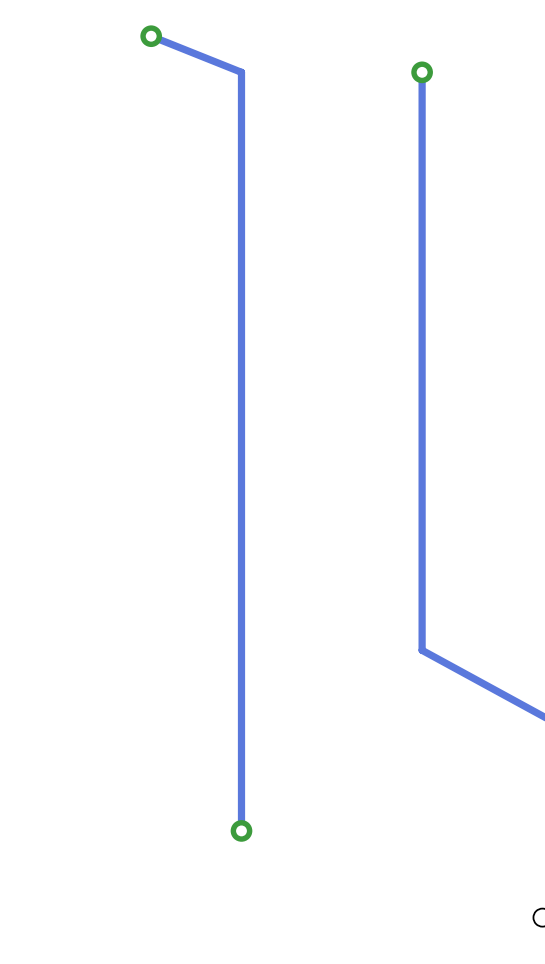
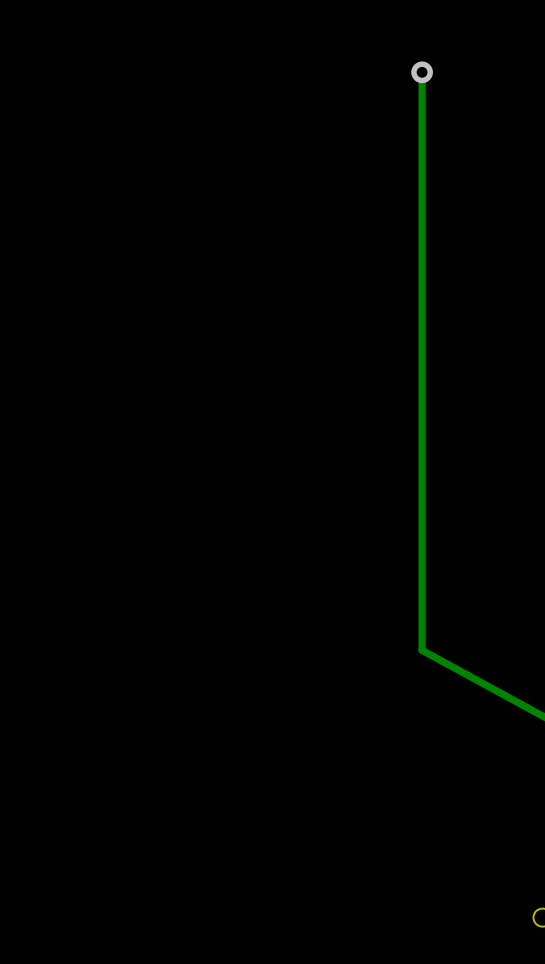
track: (151, 36) (241, 72) (241, 830) -> none
via: (151, 36) -> none
via: (241, 830) -> none

